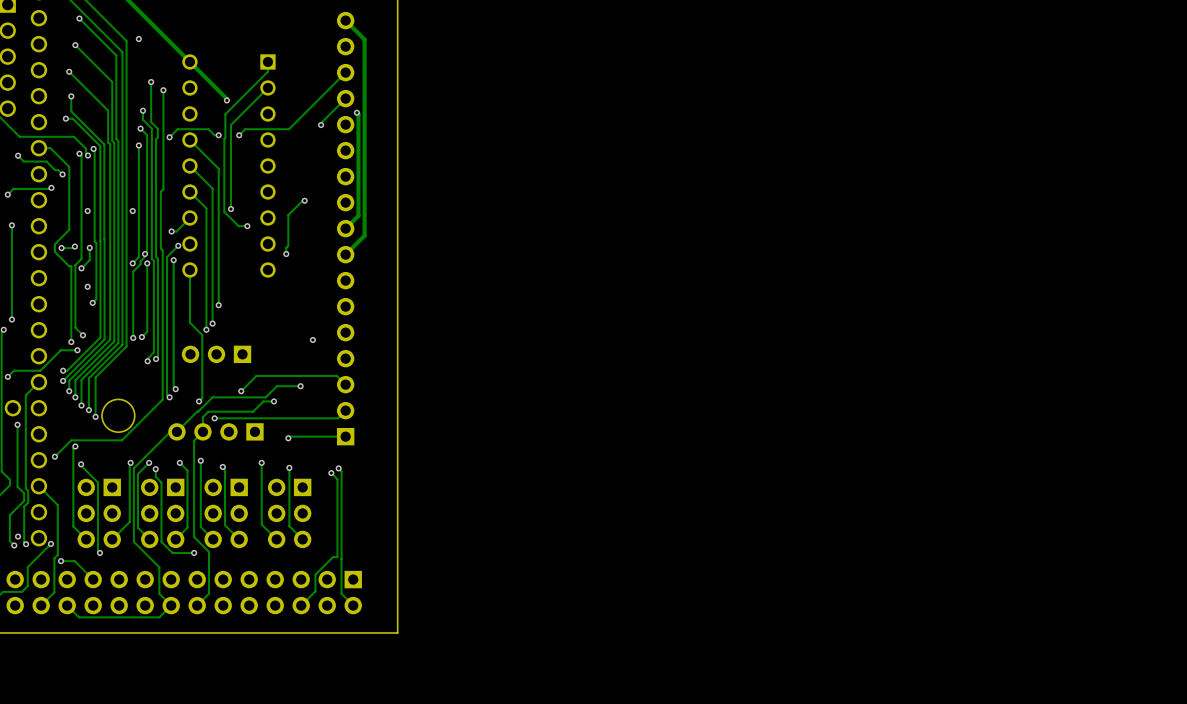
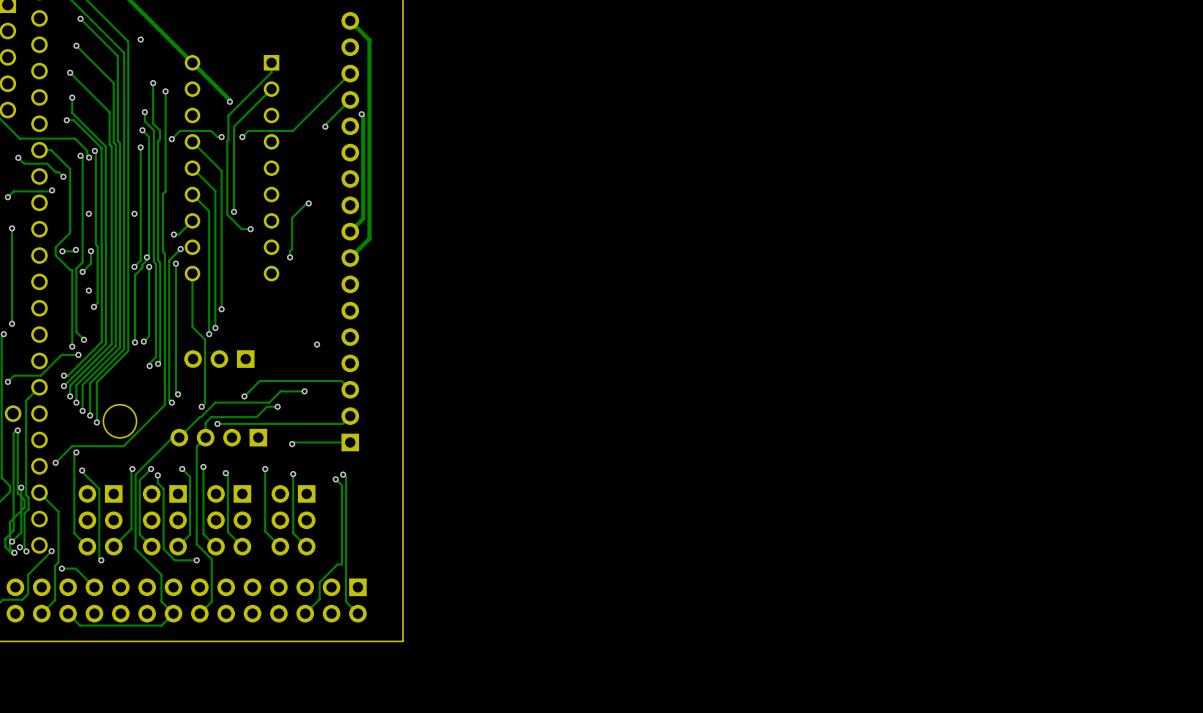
track: none -> (17, 429) (13, 432) (13, 530) (5, 538) (5, 546) (14, 554)
track: none -> (21, 487) (21, 532) (12, 541)
via: none -> (21, 487)
via: none -> (12, 541)
via: (18, 536) -> none
via: none -> (19, 547)

